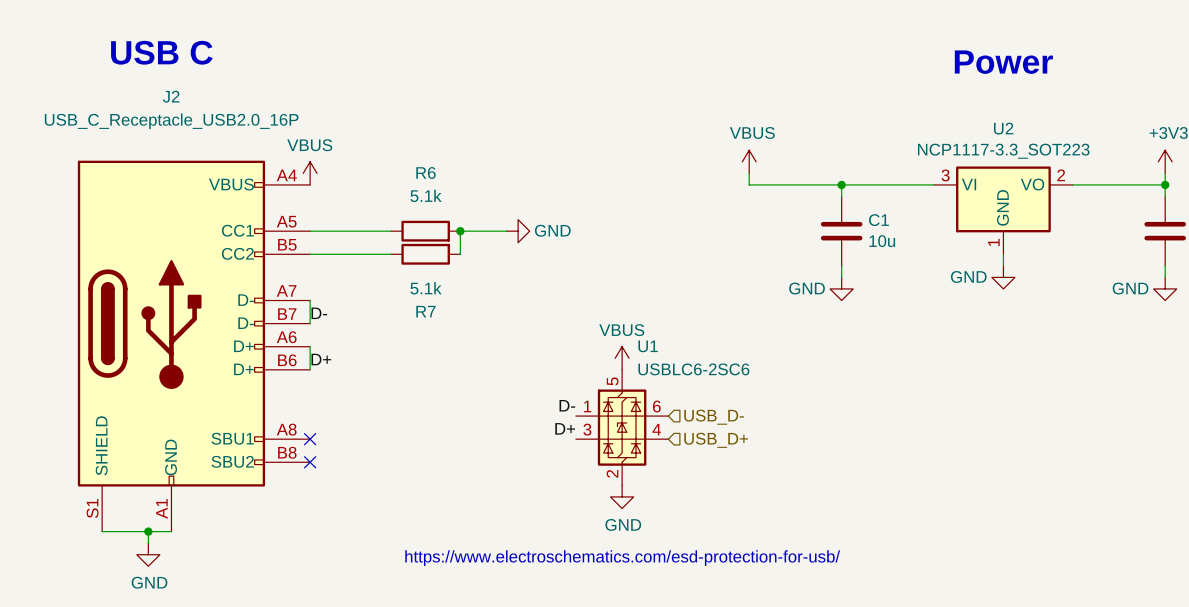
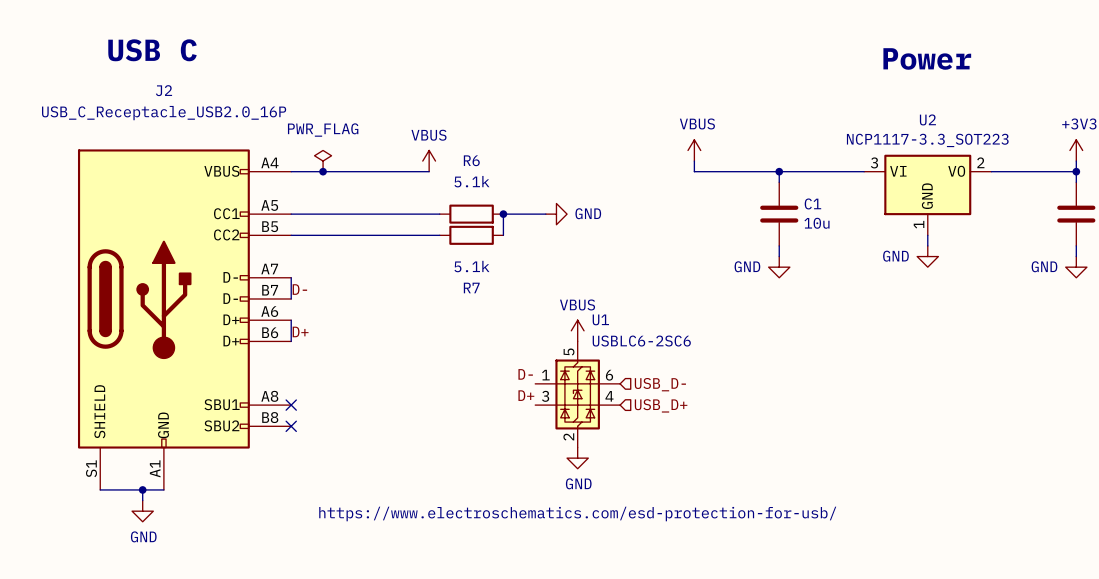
power symbol position: VBUS (310, 173) -> VBUS (429, 161)
power symbol: none -> PWR_FLAG (323, 161)
wire: none -> (291, 171) (429, 171)
junction: none -> (323, 171)
R6 position: (425, 231) -> (471, 214)
wire: (460, 231) (460, 254) -> (429, 214) (365, 214)
junction: (460, 231) -> none
wire: (471, 231) (506, 231) -> none
power symbol position: GND (518, 231) -> GND (556, 214)
junction: none -> (503, 214)
wire: none -> (545, 214) (503, 214) (503, 235)
wire: none -> (365, 235) (439, 235)
R7 position: (425, 254) -> (471, 235)

